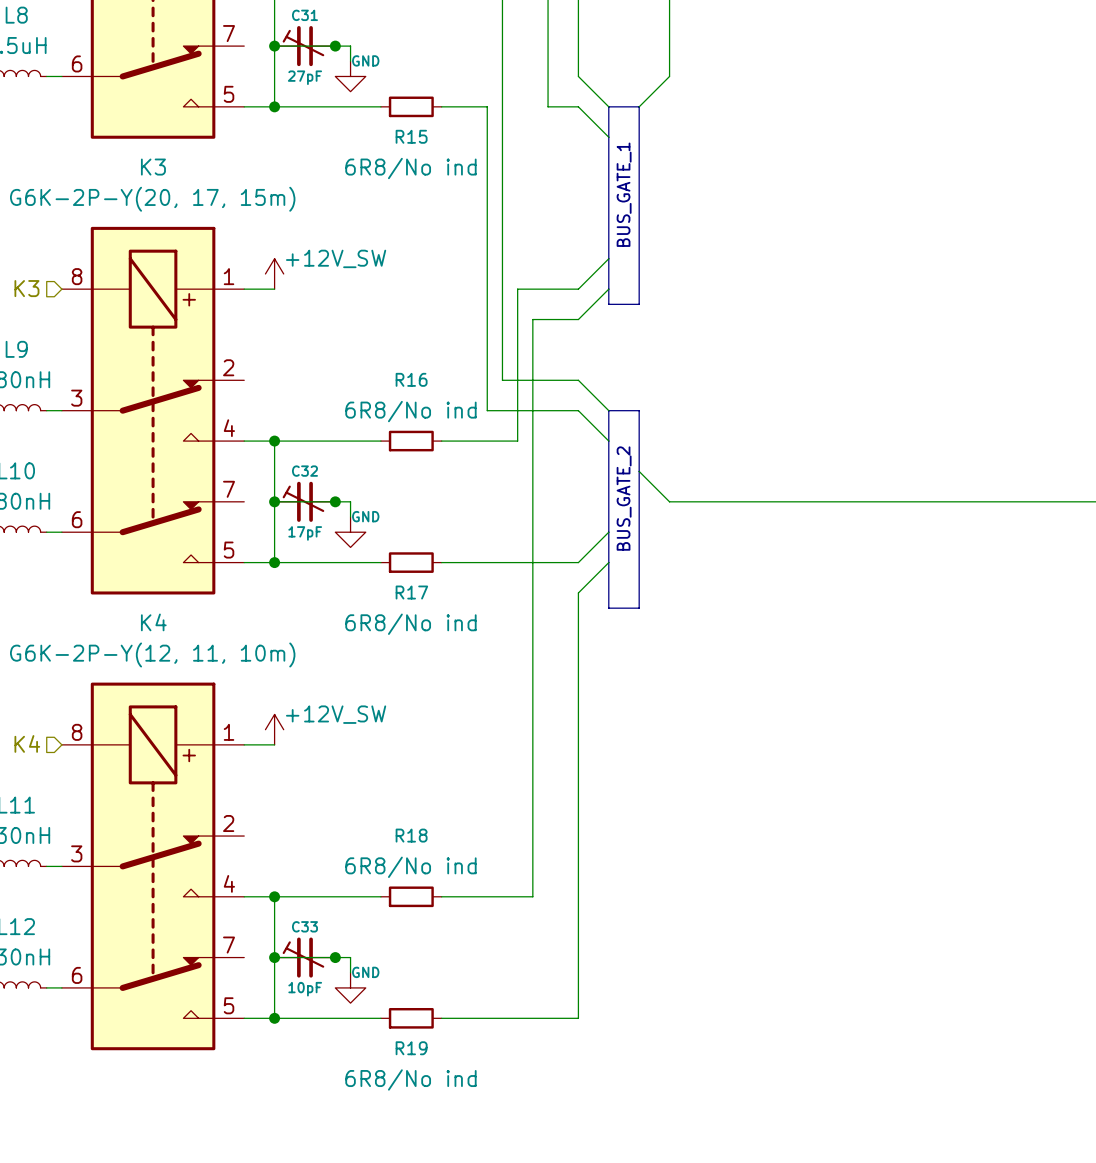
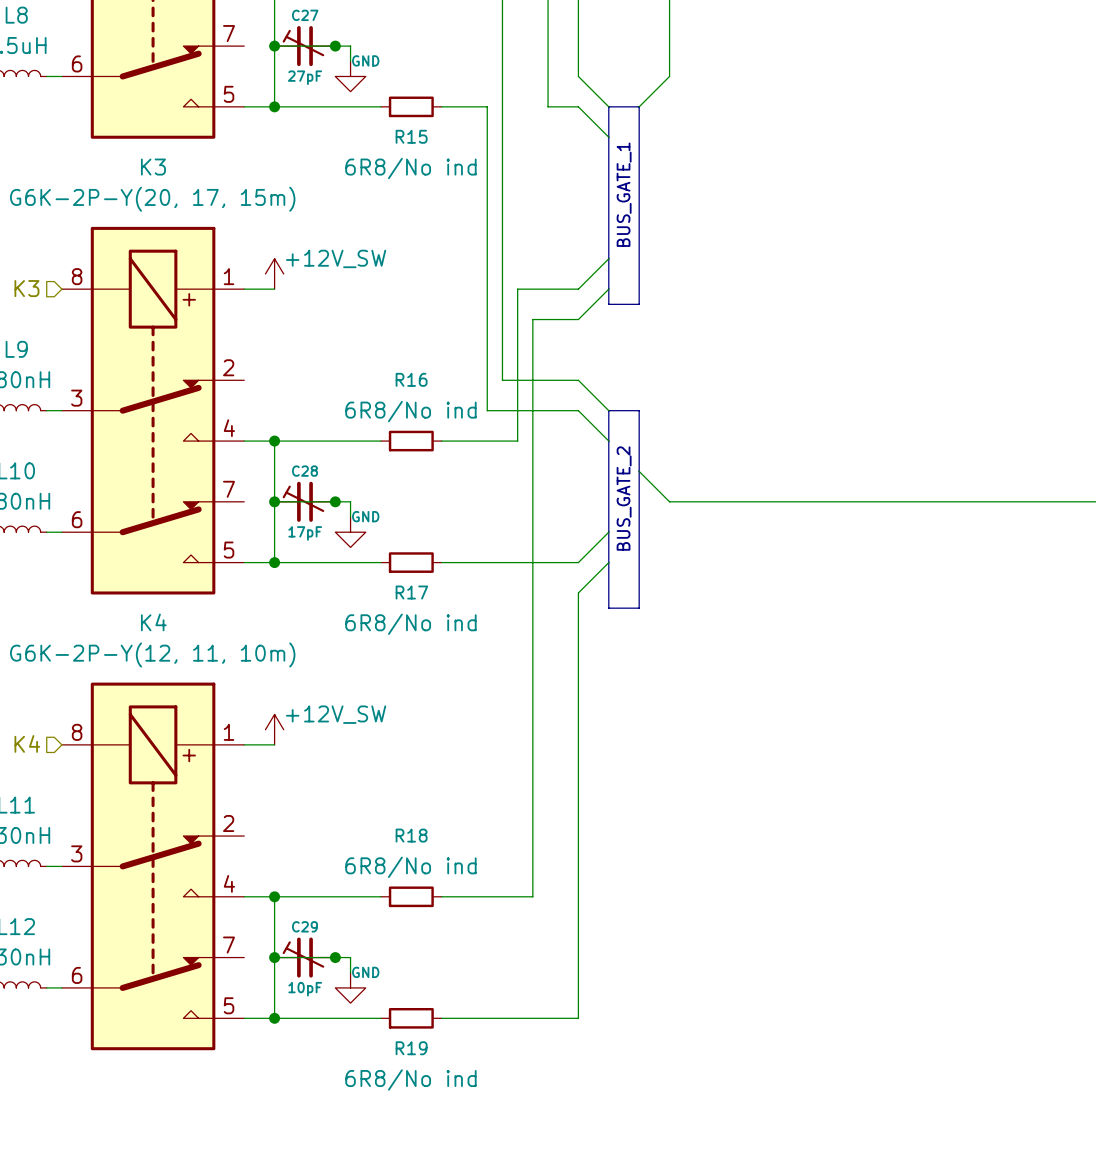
C31 name: C31 (304, 15) -> C27 (305, 15)
C32 name: C32 (304, 471) -> C28 (304, 471)
C33 name: C33 (304, 926) -> C29 (304, 926)

